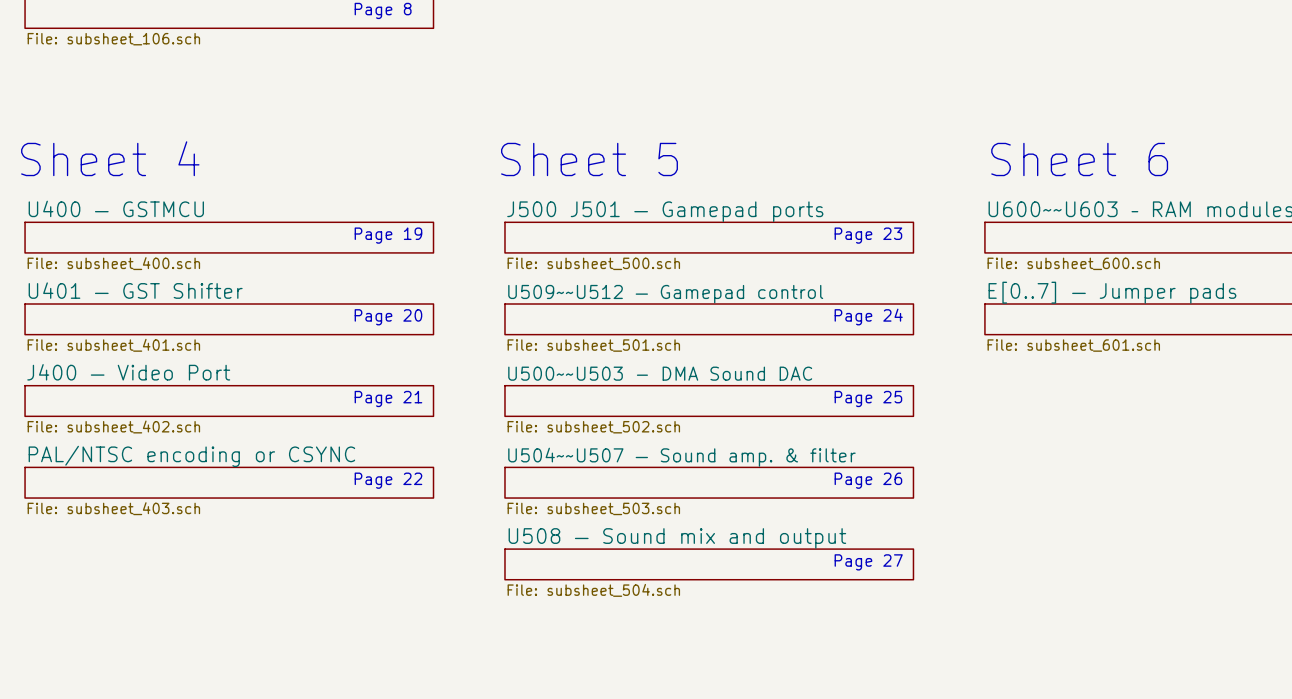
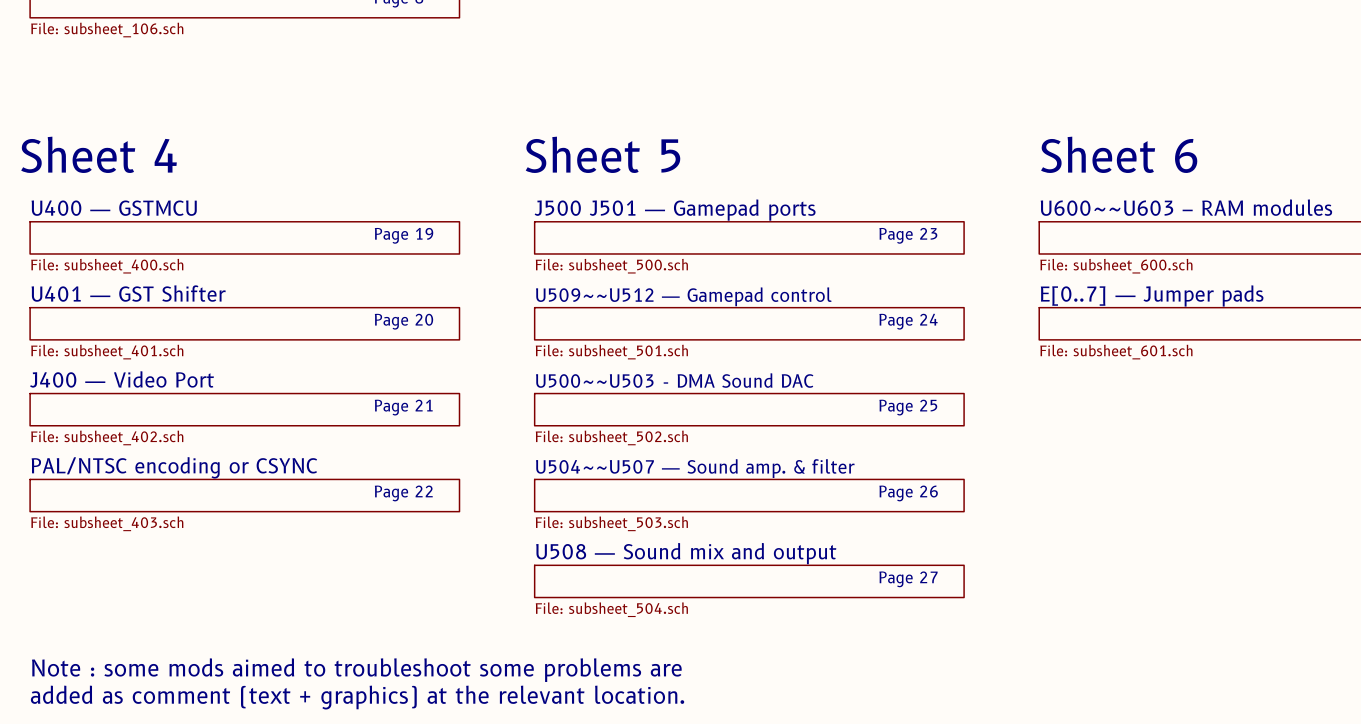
text: none -> Note : some mods aimed to troubleshoot some problems are (356, 670)
text: none -> added as comment (text + graphics) at the relevant location. (357, 697)

